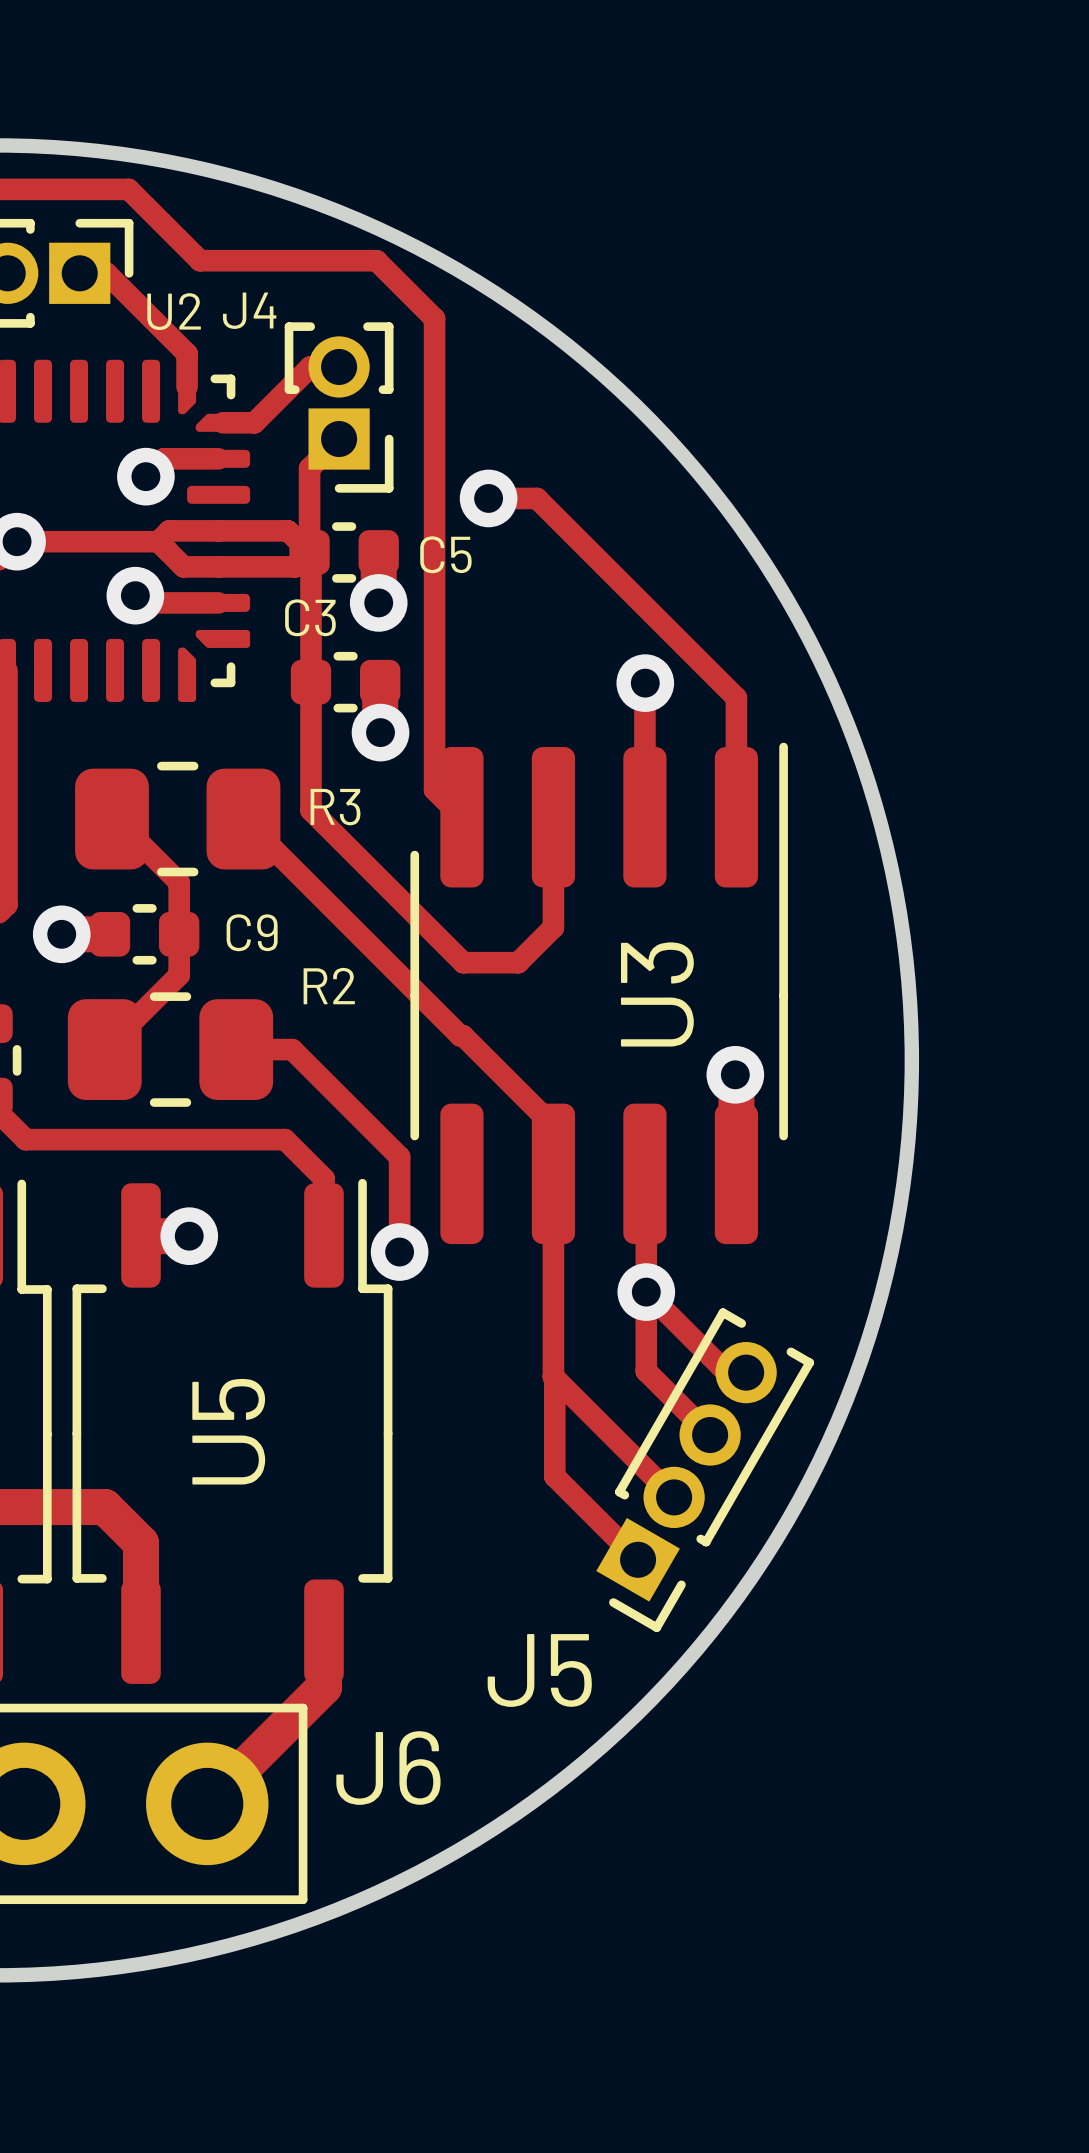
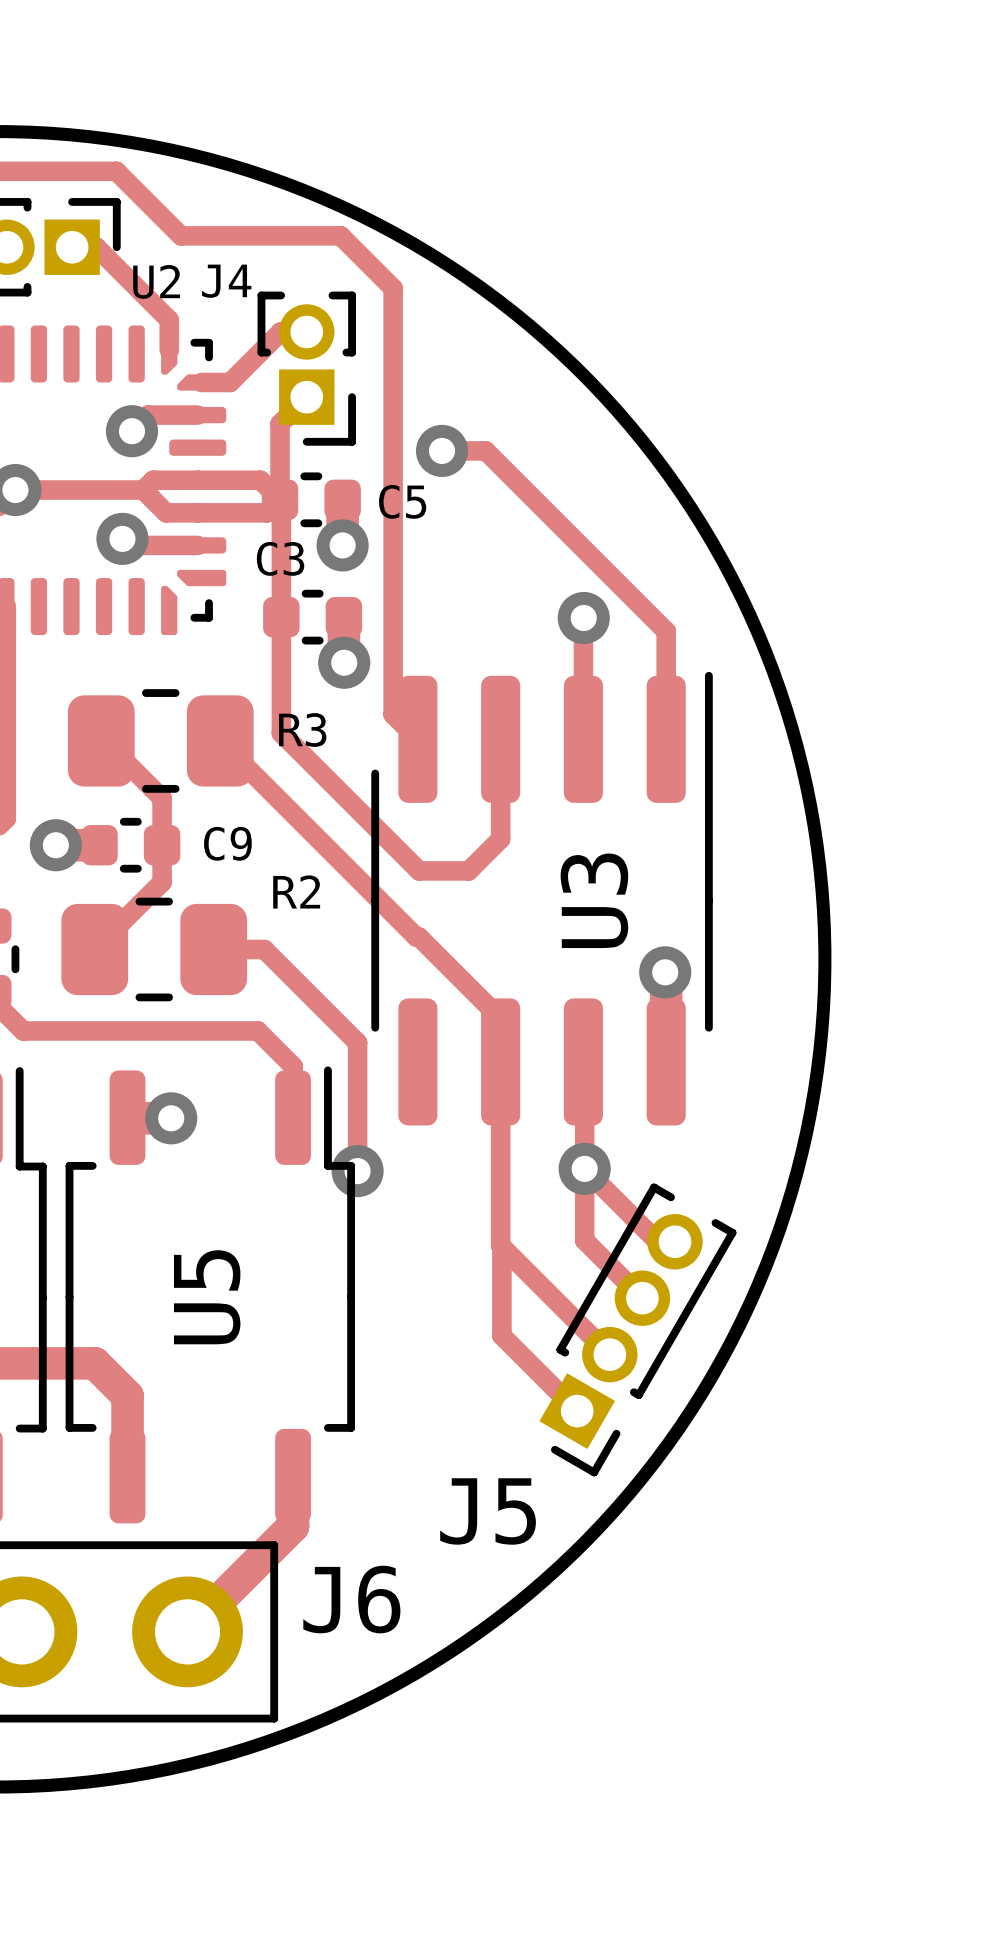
track: (395, 1152) (399, 1156) (399, 1252) -> (357, 1042) (357, 1171)
via position: (399, 1252) -> (357, 1171)

